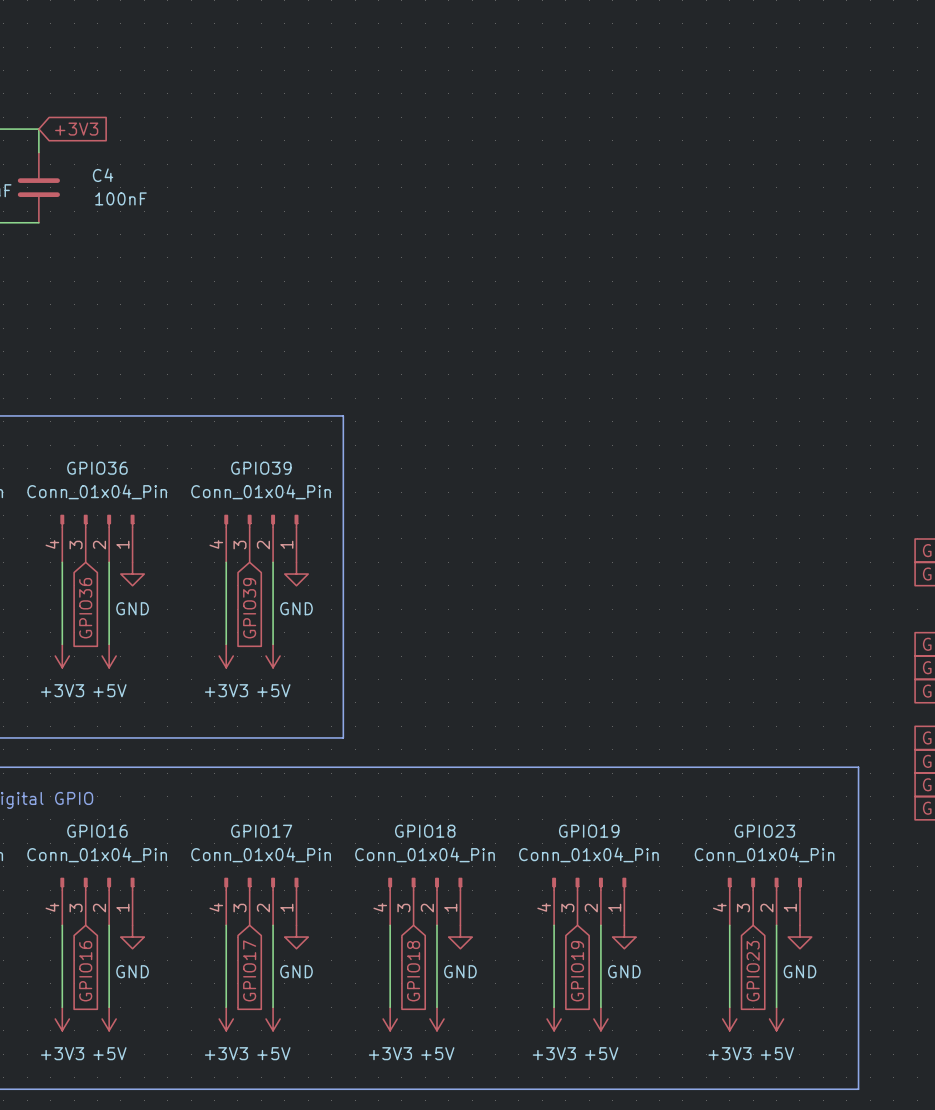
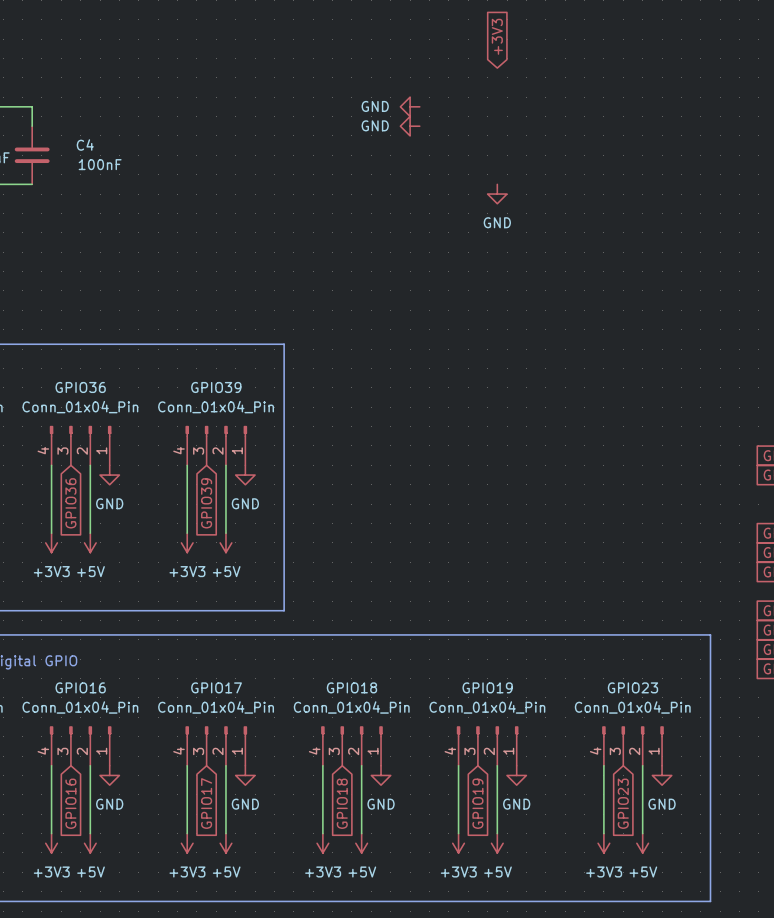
global label: none -> +3V3 (497, 36)
global label: +3V3 (76, 129) -> none
power symbol: none -> GND (410, 106)
power symbol: none -> GND (410, 126)
power symbol: none -> GND (497, 194)

